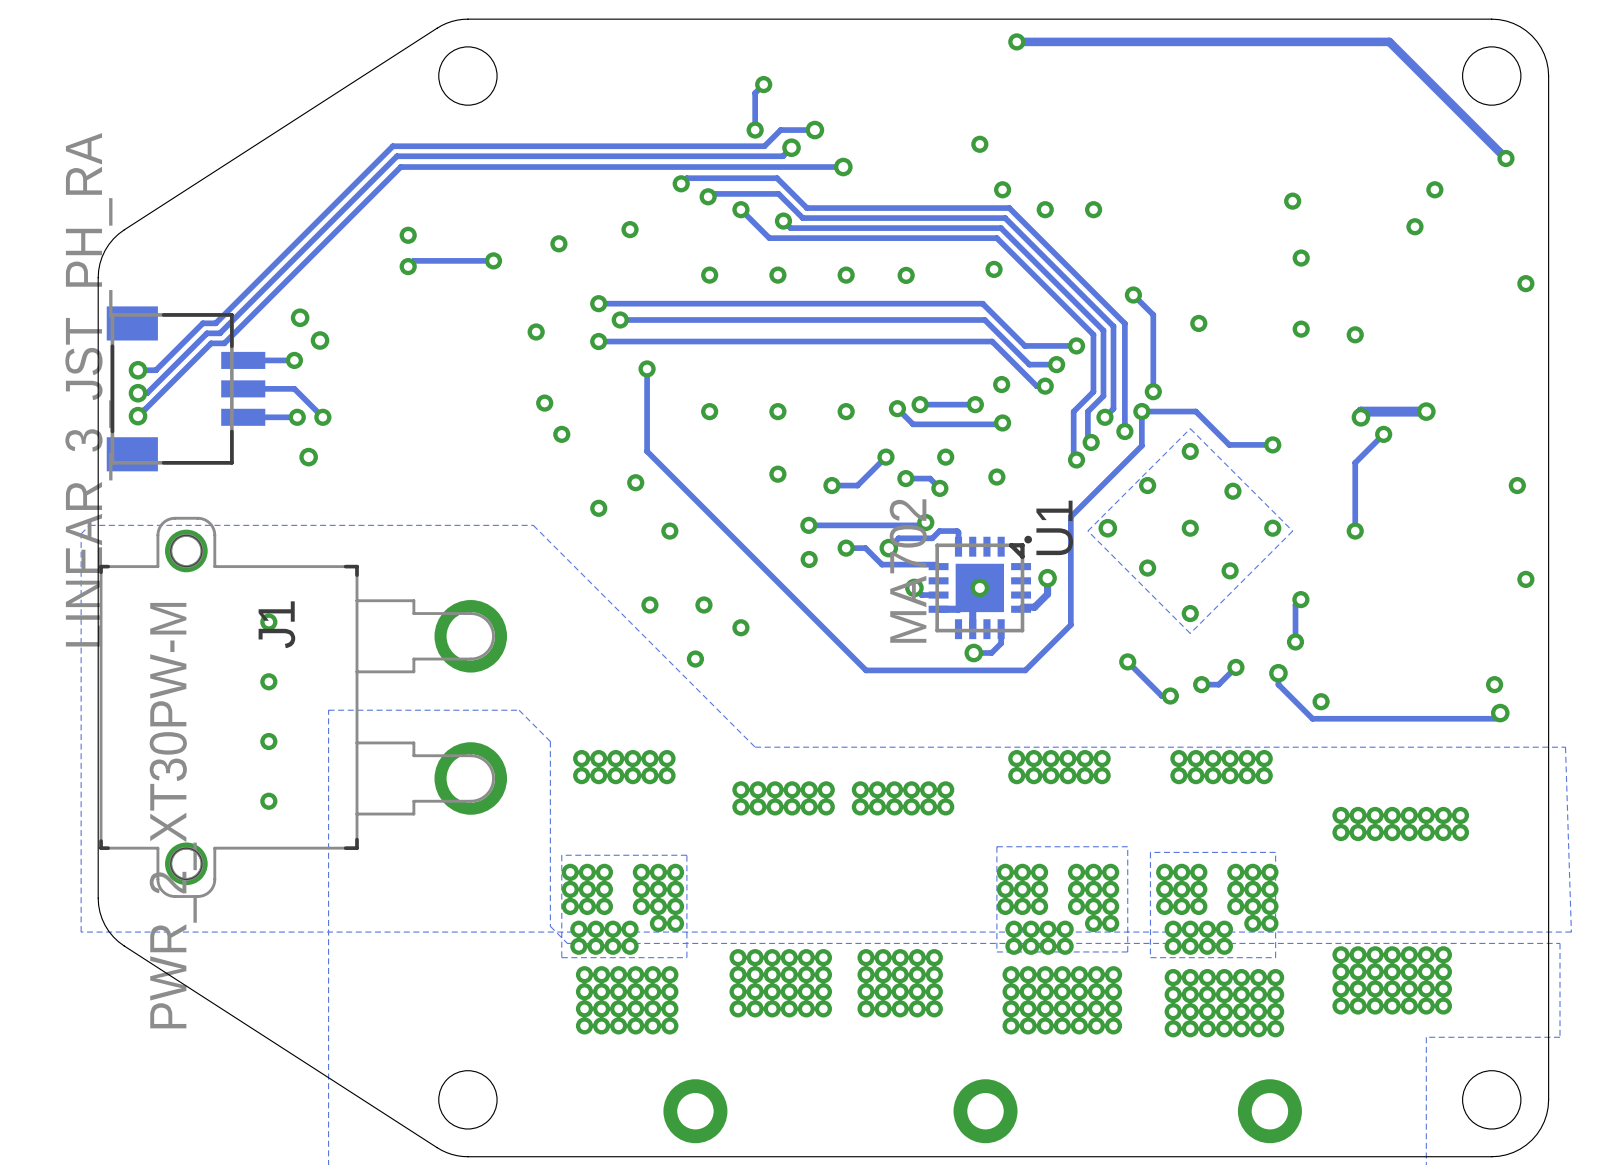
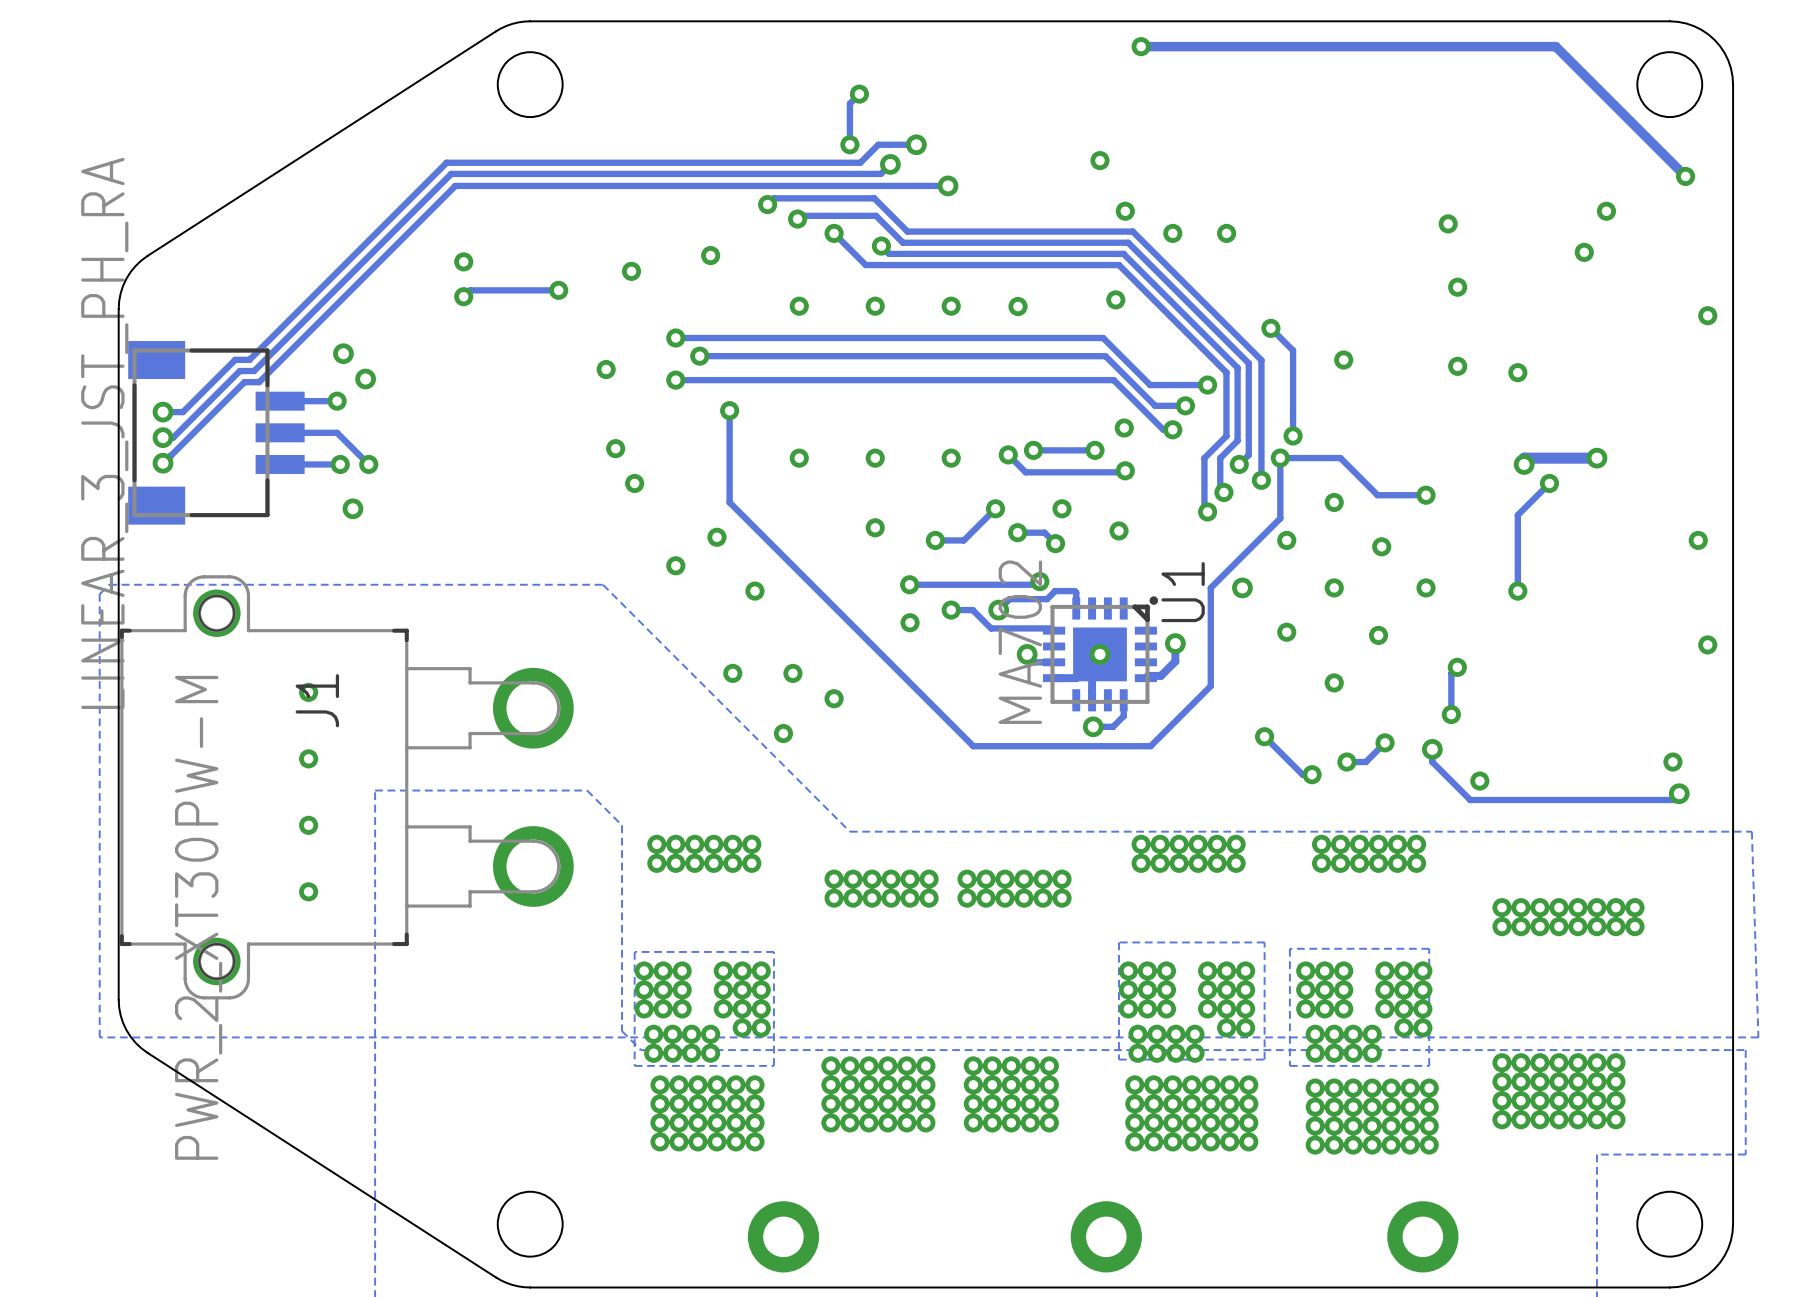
zone outline: (1190, 428) (1087, 531) (1190, 633) (1292, 531) (1190, 428) -> none
track: (1141, 445) (1070, 516) (1070, 624) -> (1280, 496) (1280, 518) (1210, 587) (1210, 686) (1201, 695)

